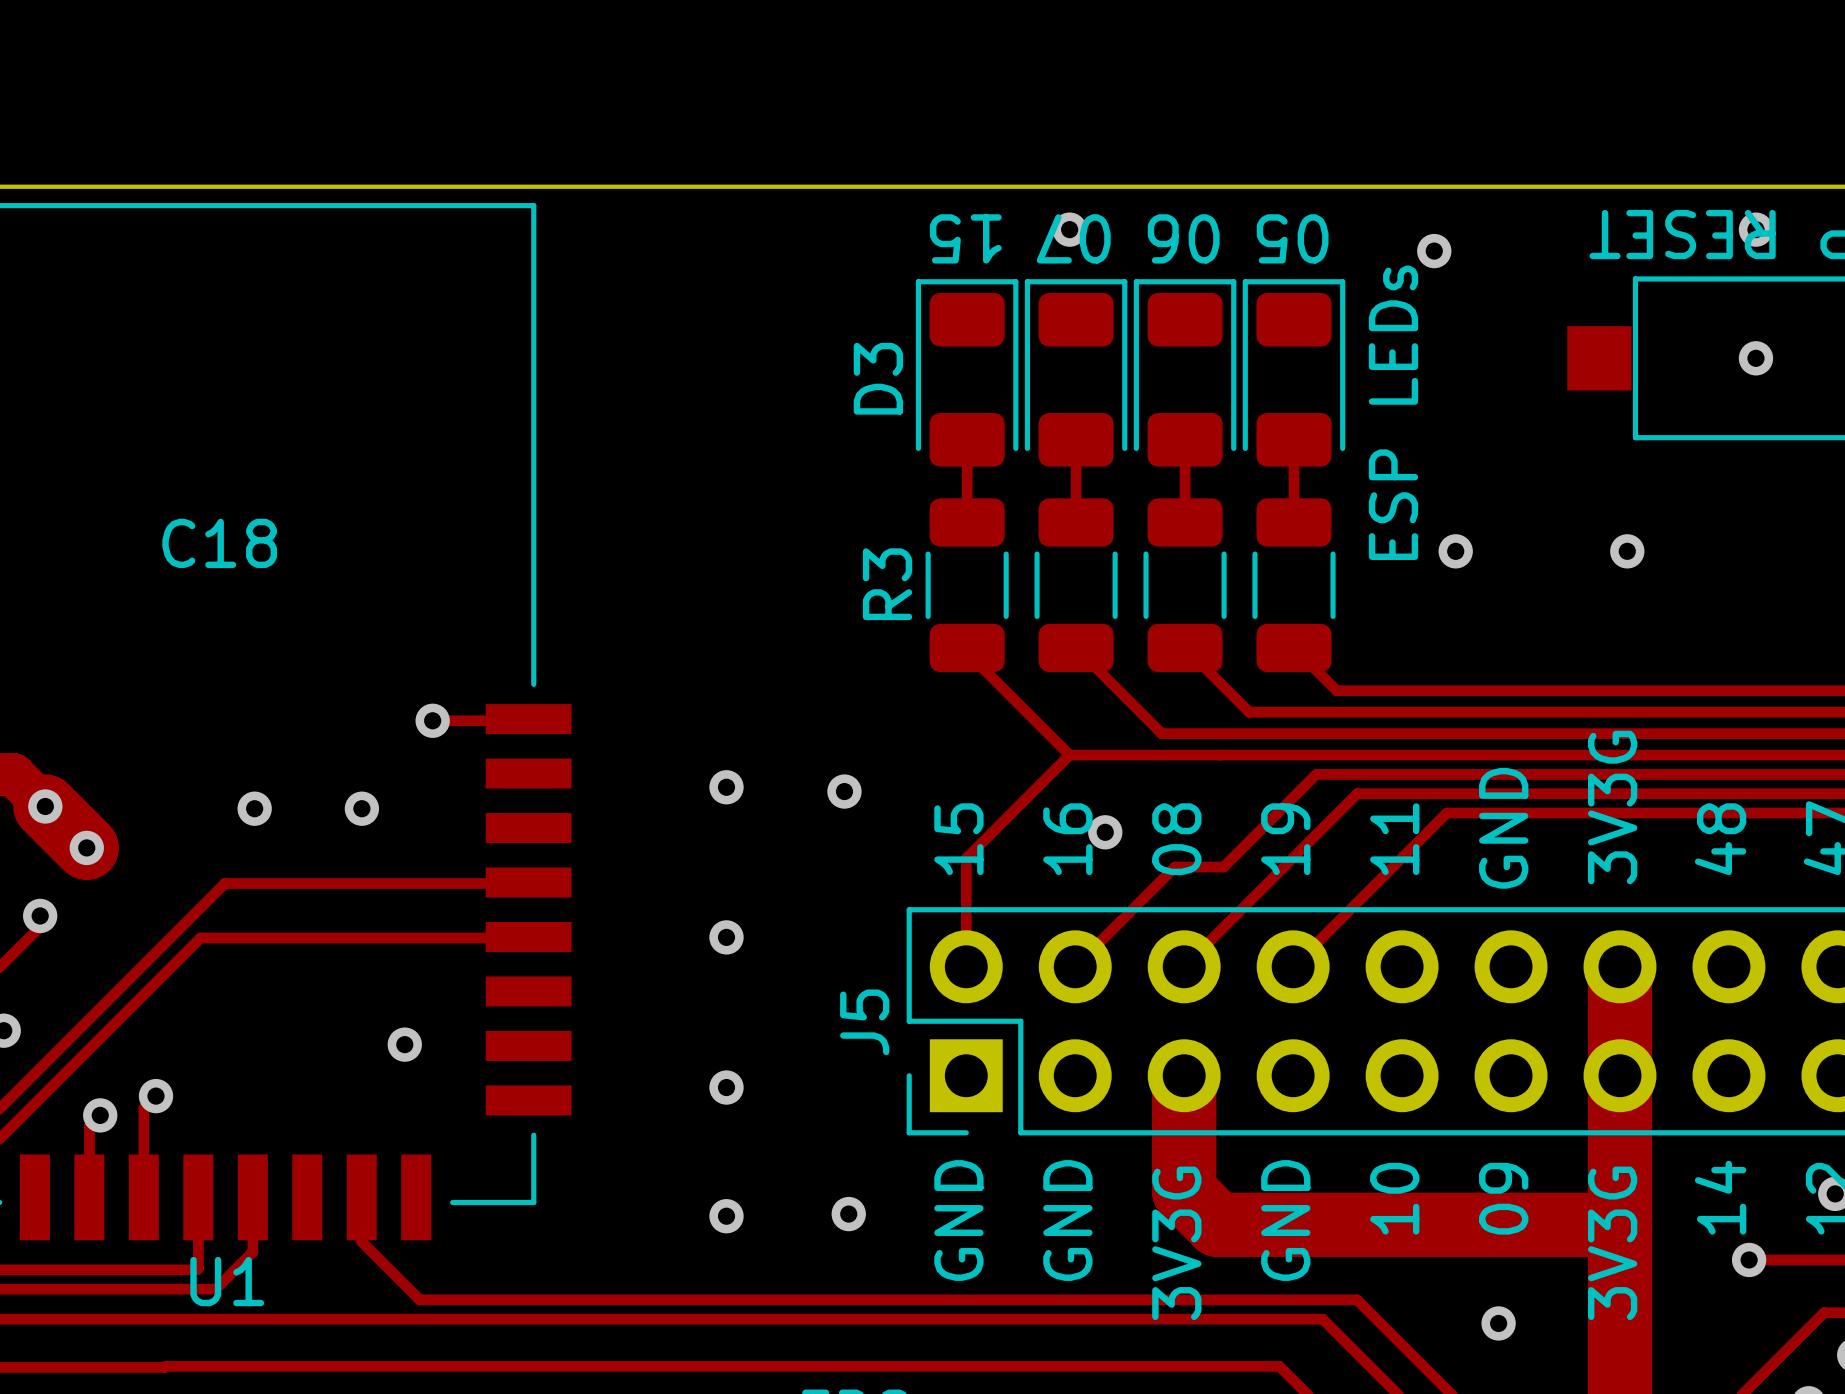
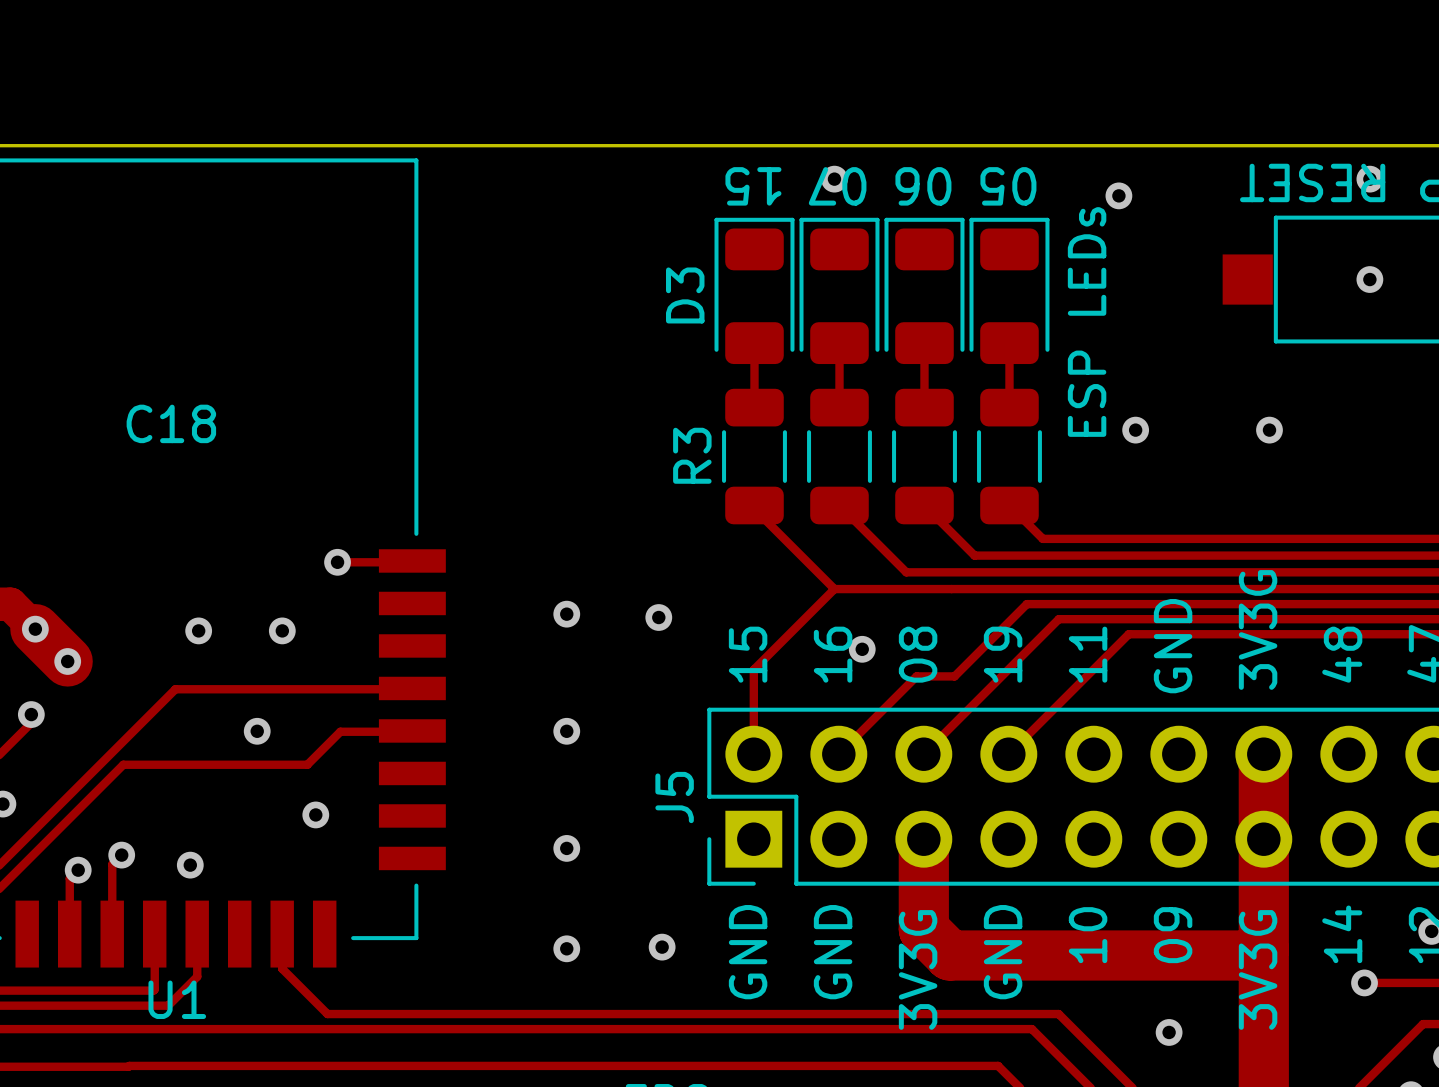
via: none -> (257, 731)
track: (436, 938) (200, 938) (158, 980) -> (340, 731) (307, 764) (123, 764)
via: none -> (190, 865)

